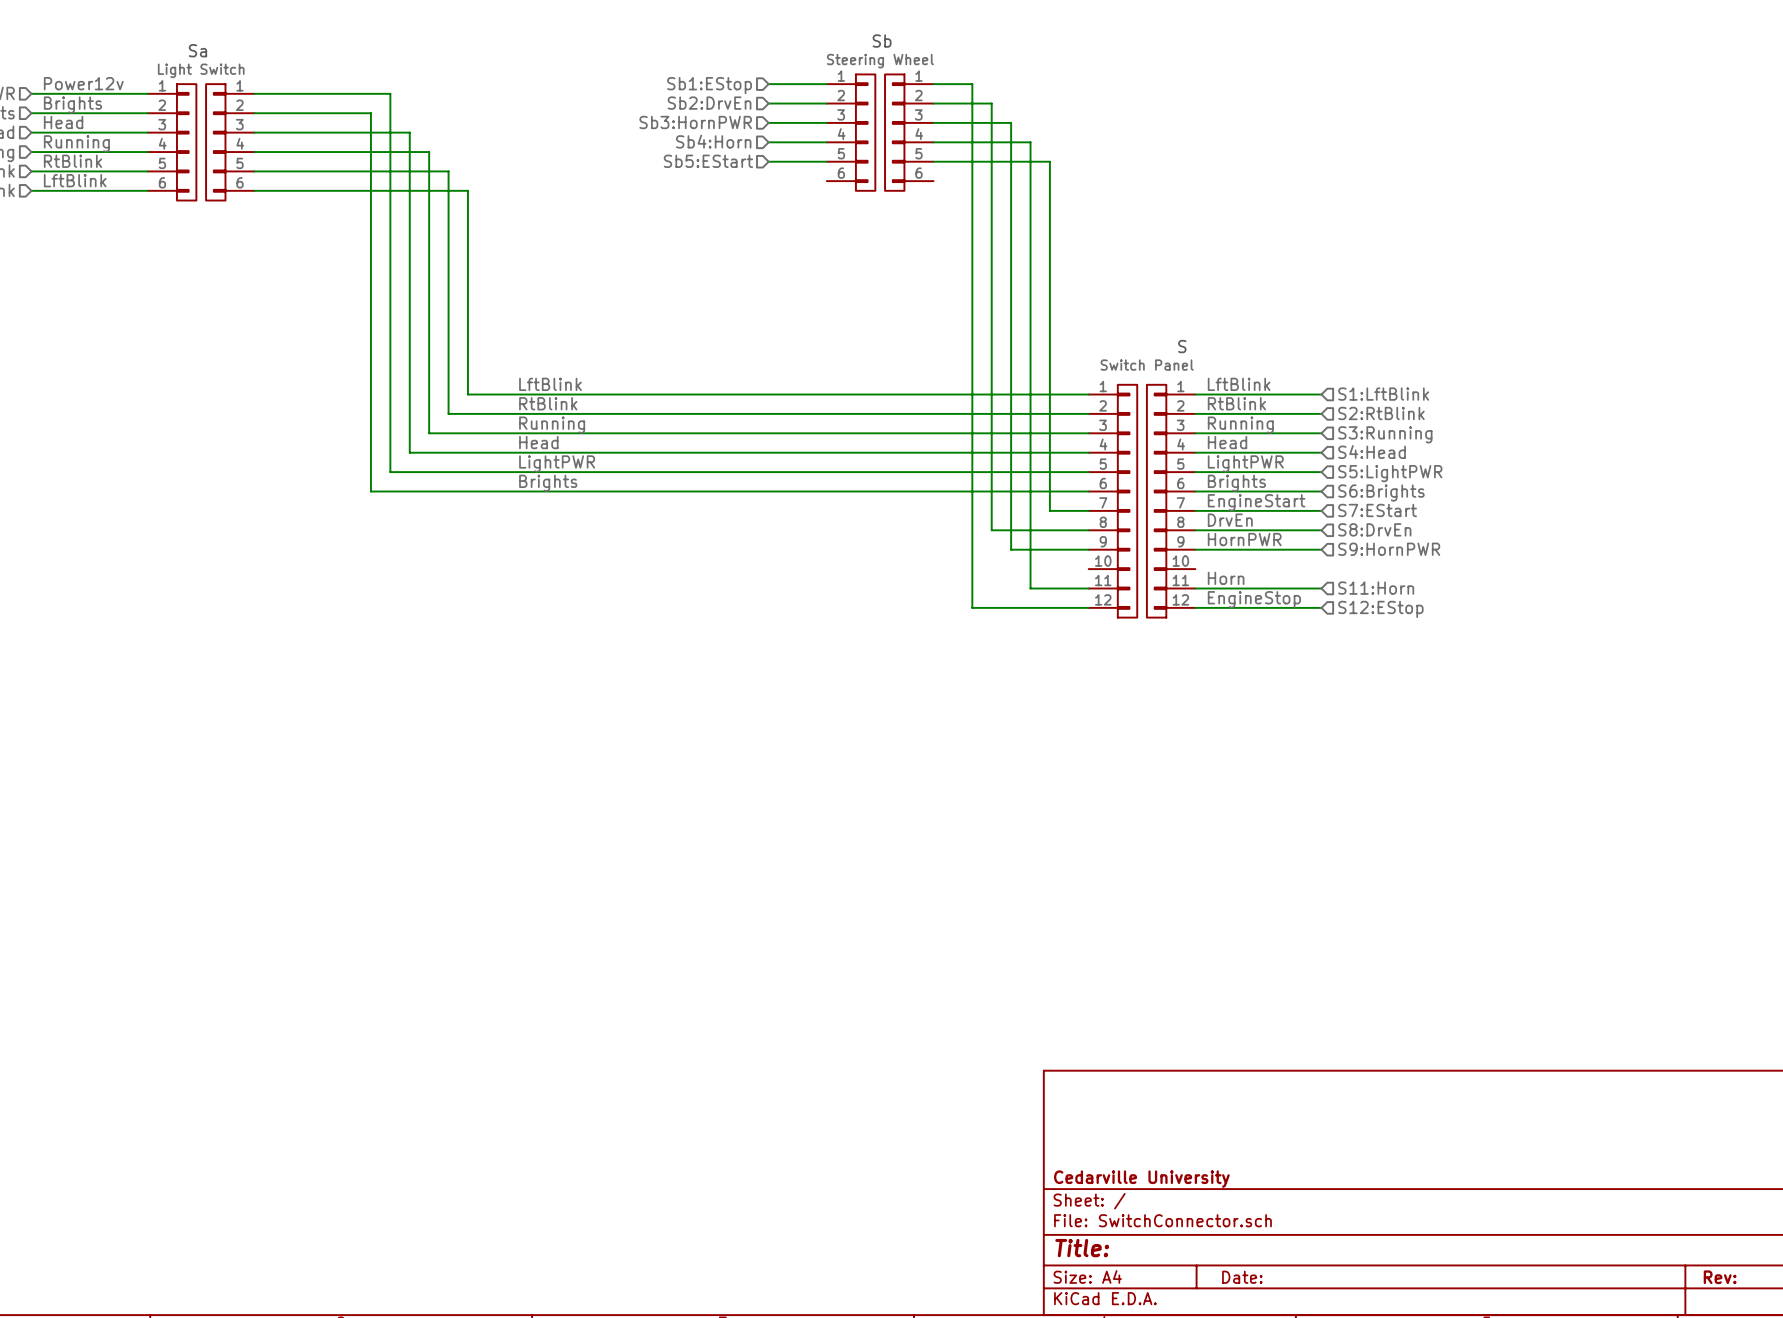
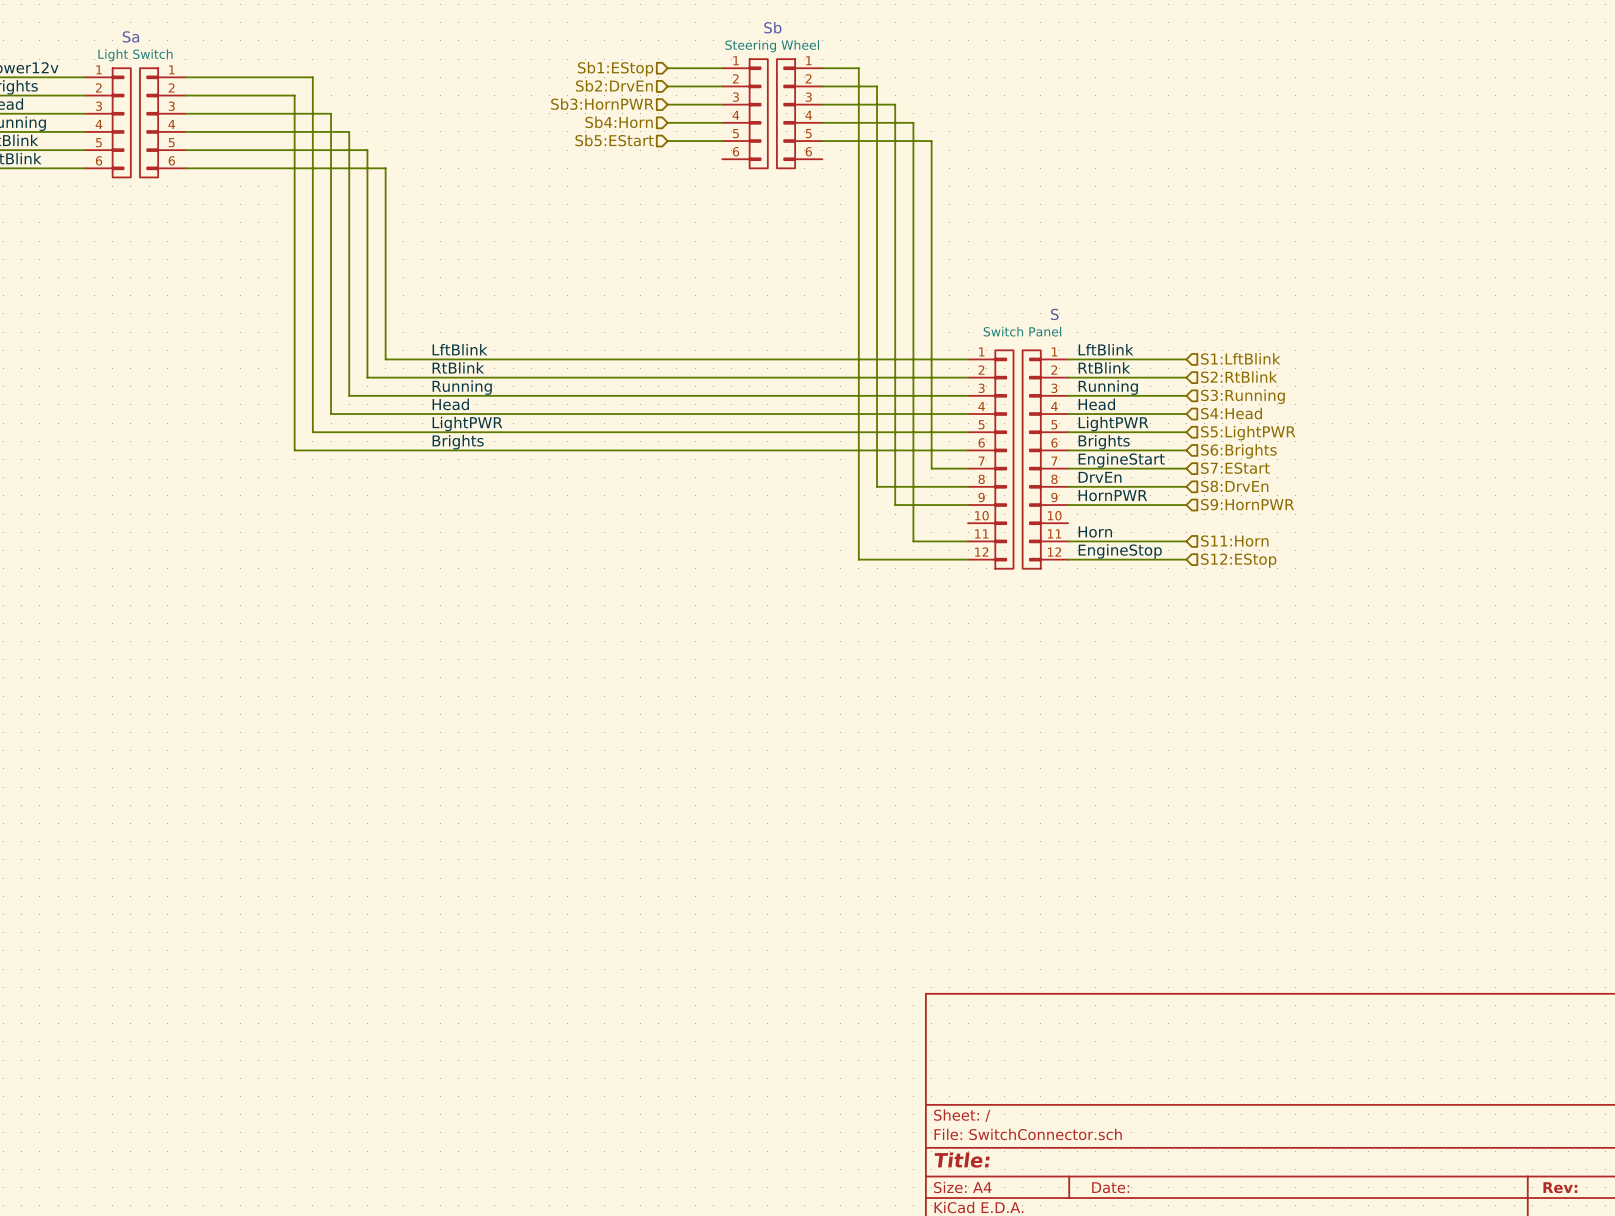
title block: Cedarville University (1141, 1179) -> none

